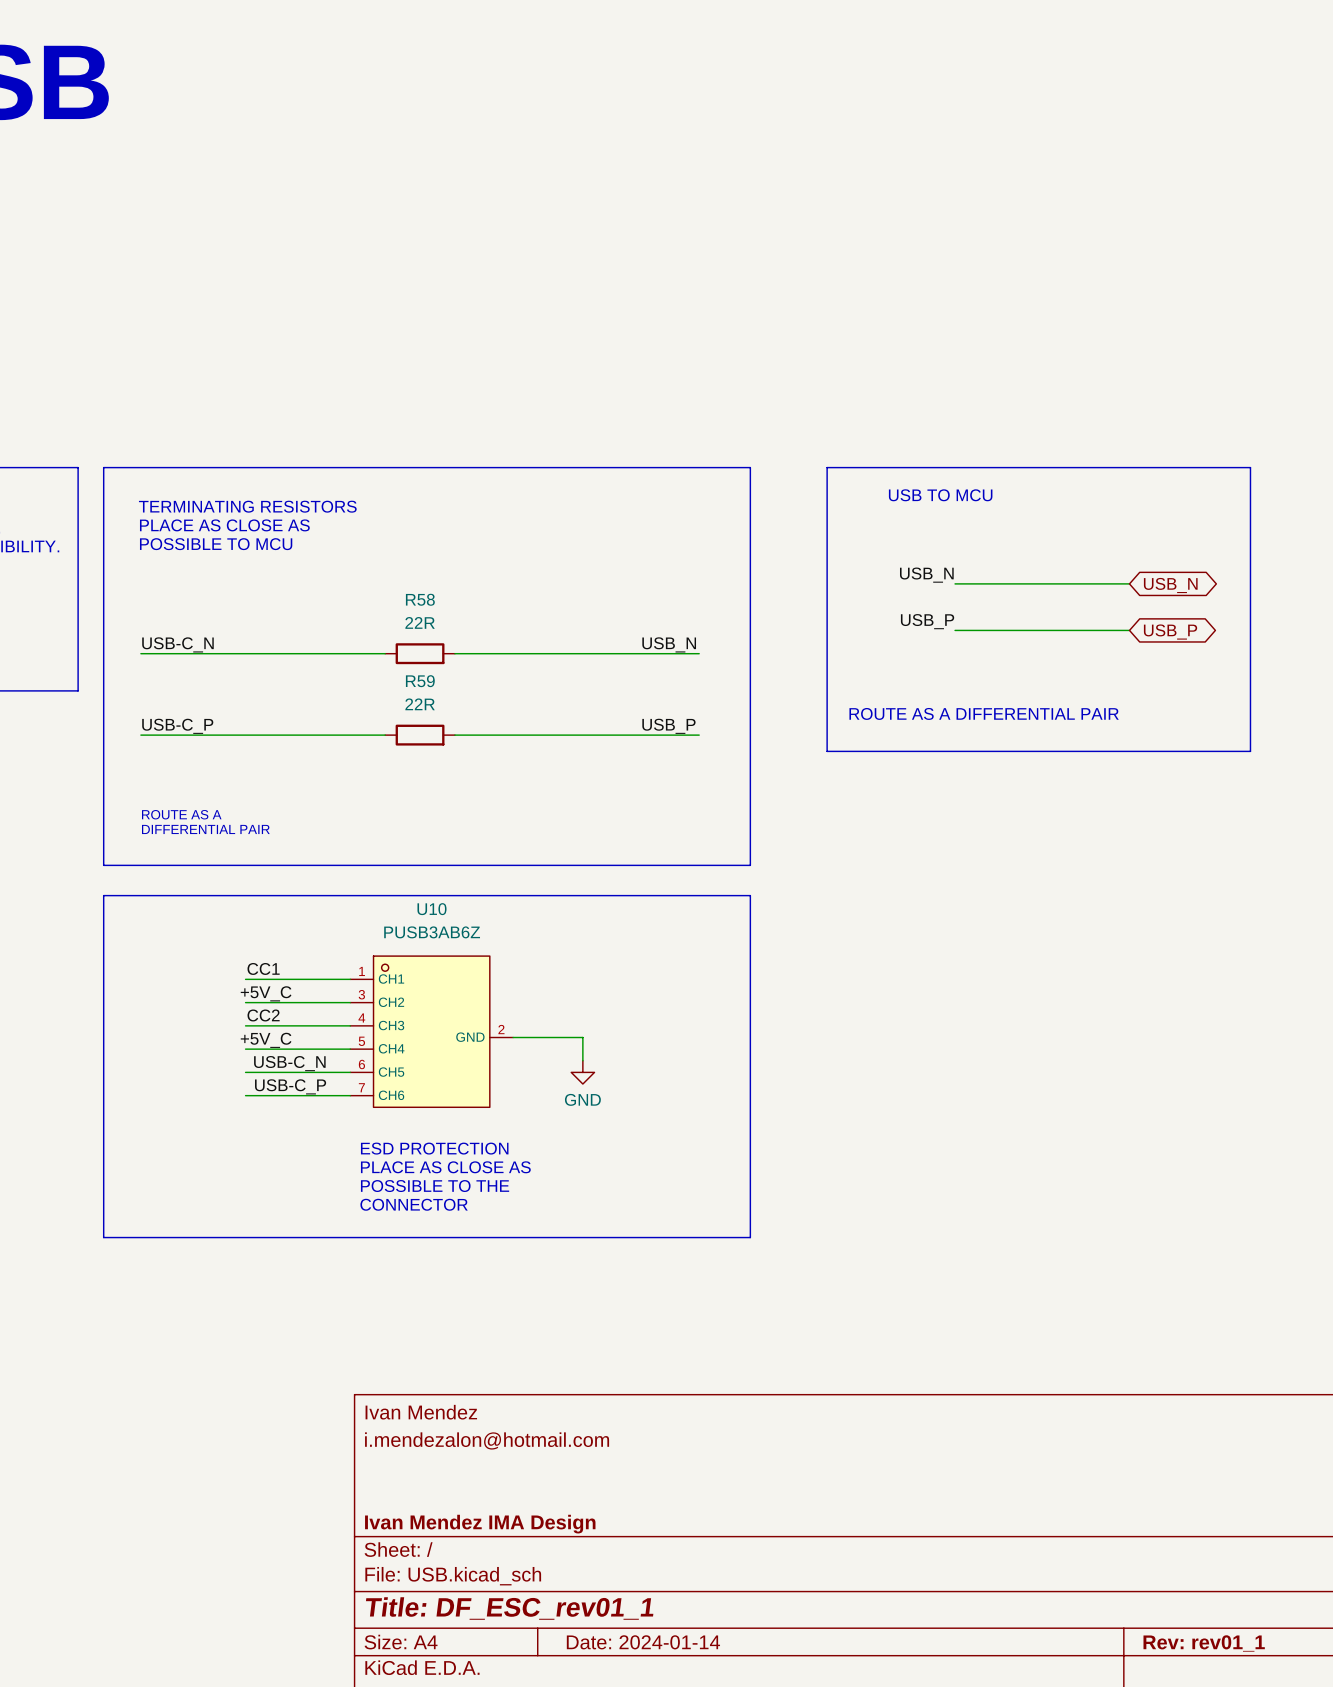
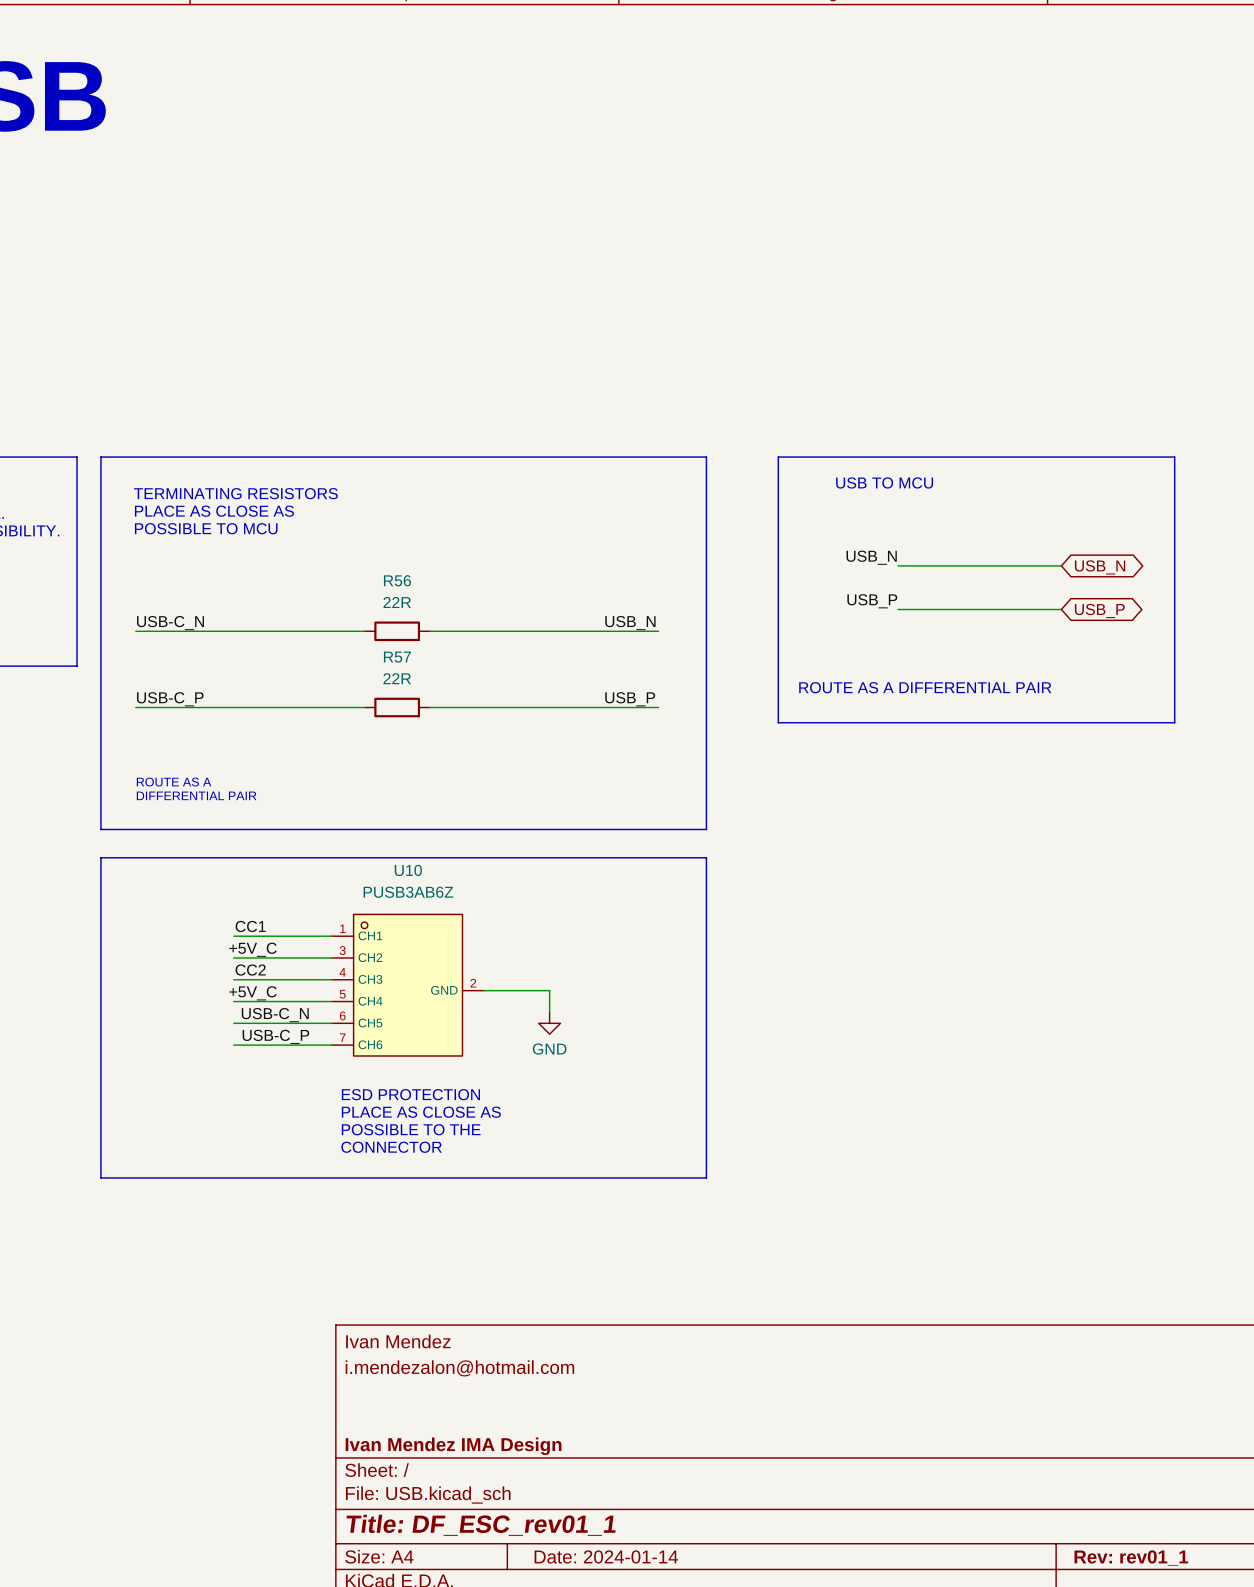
R58 name: R58 (420, 599) -> R56 (397, 580)
R59 name: R59 (420, 681) -> R57 (397, 657)

